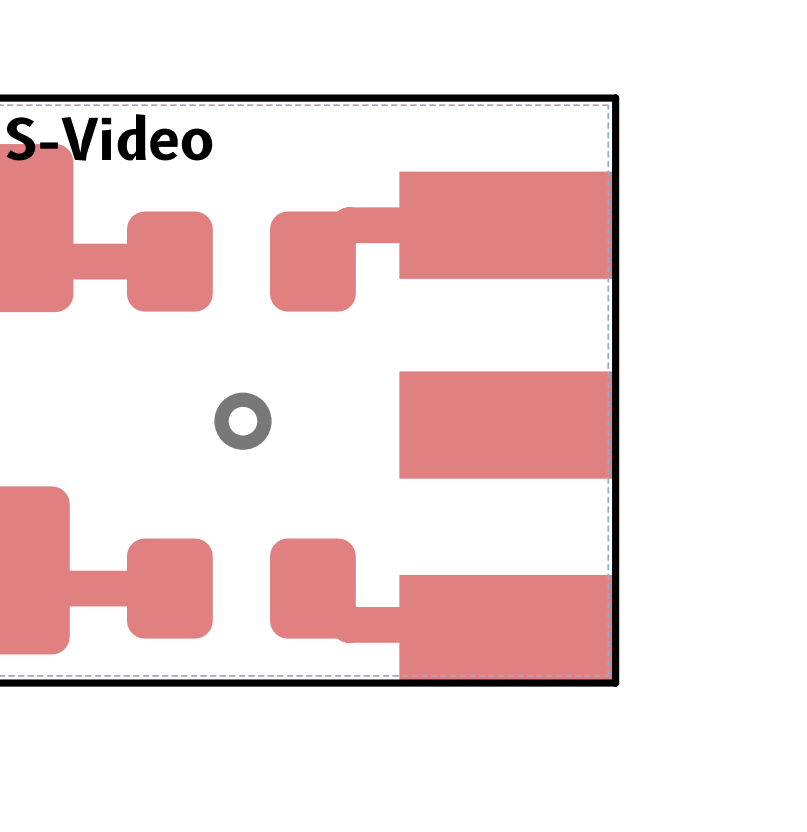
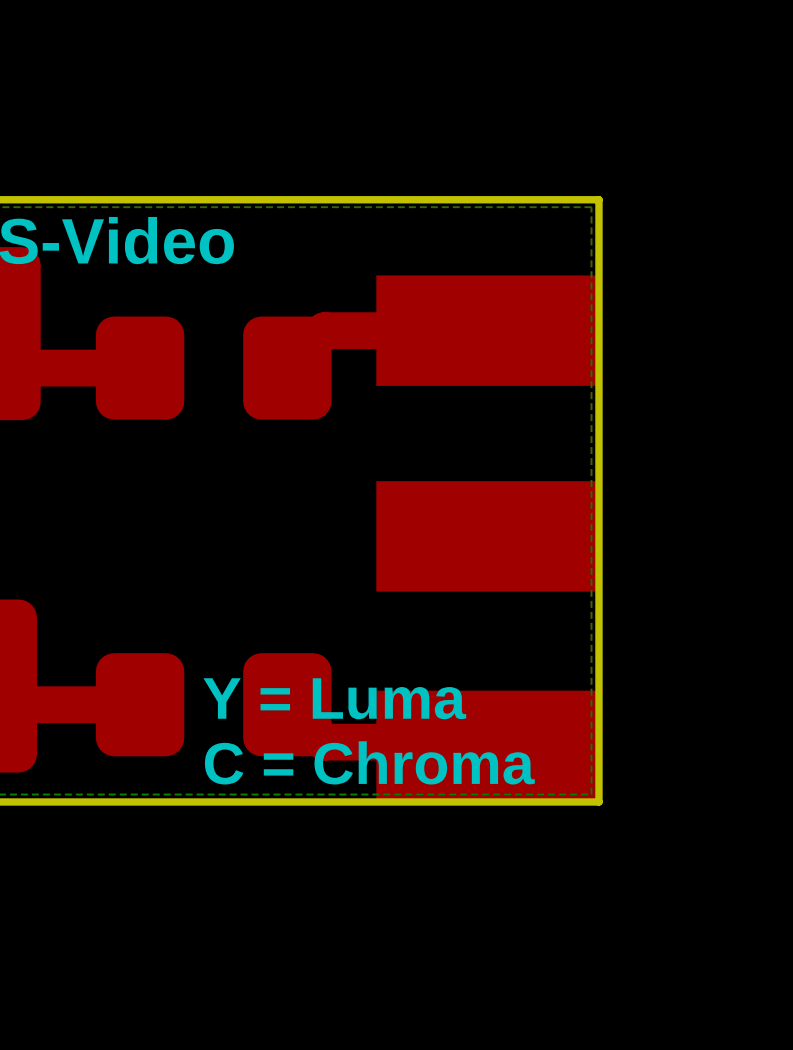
via: (242, 421) -> none
text: none -> Y = Luma (334, 698)
text: none -> C = Chroma (369, 762)

